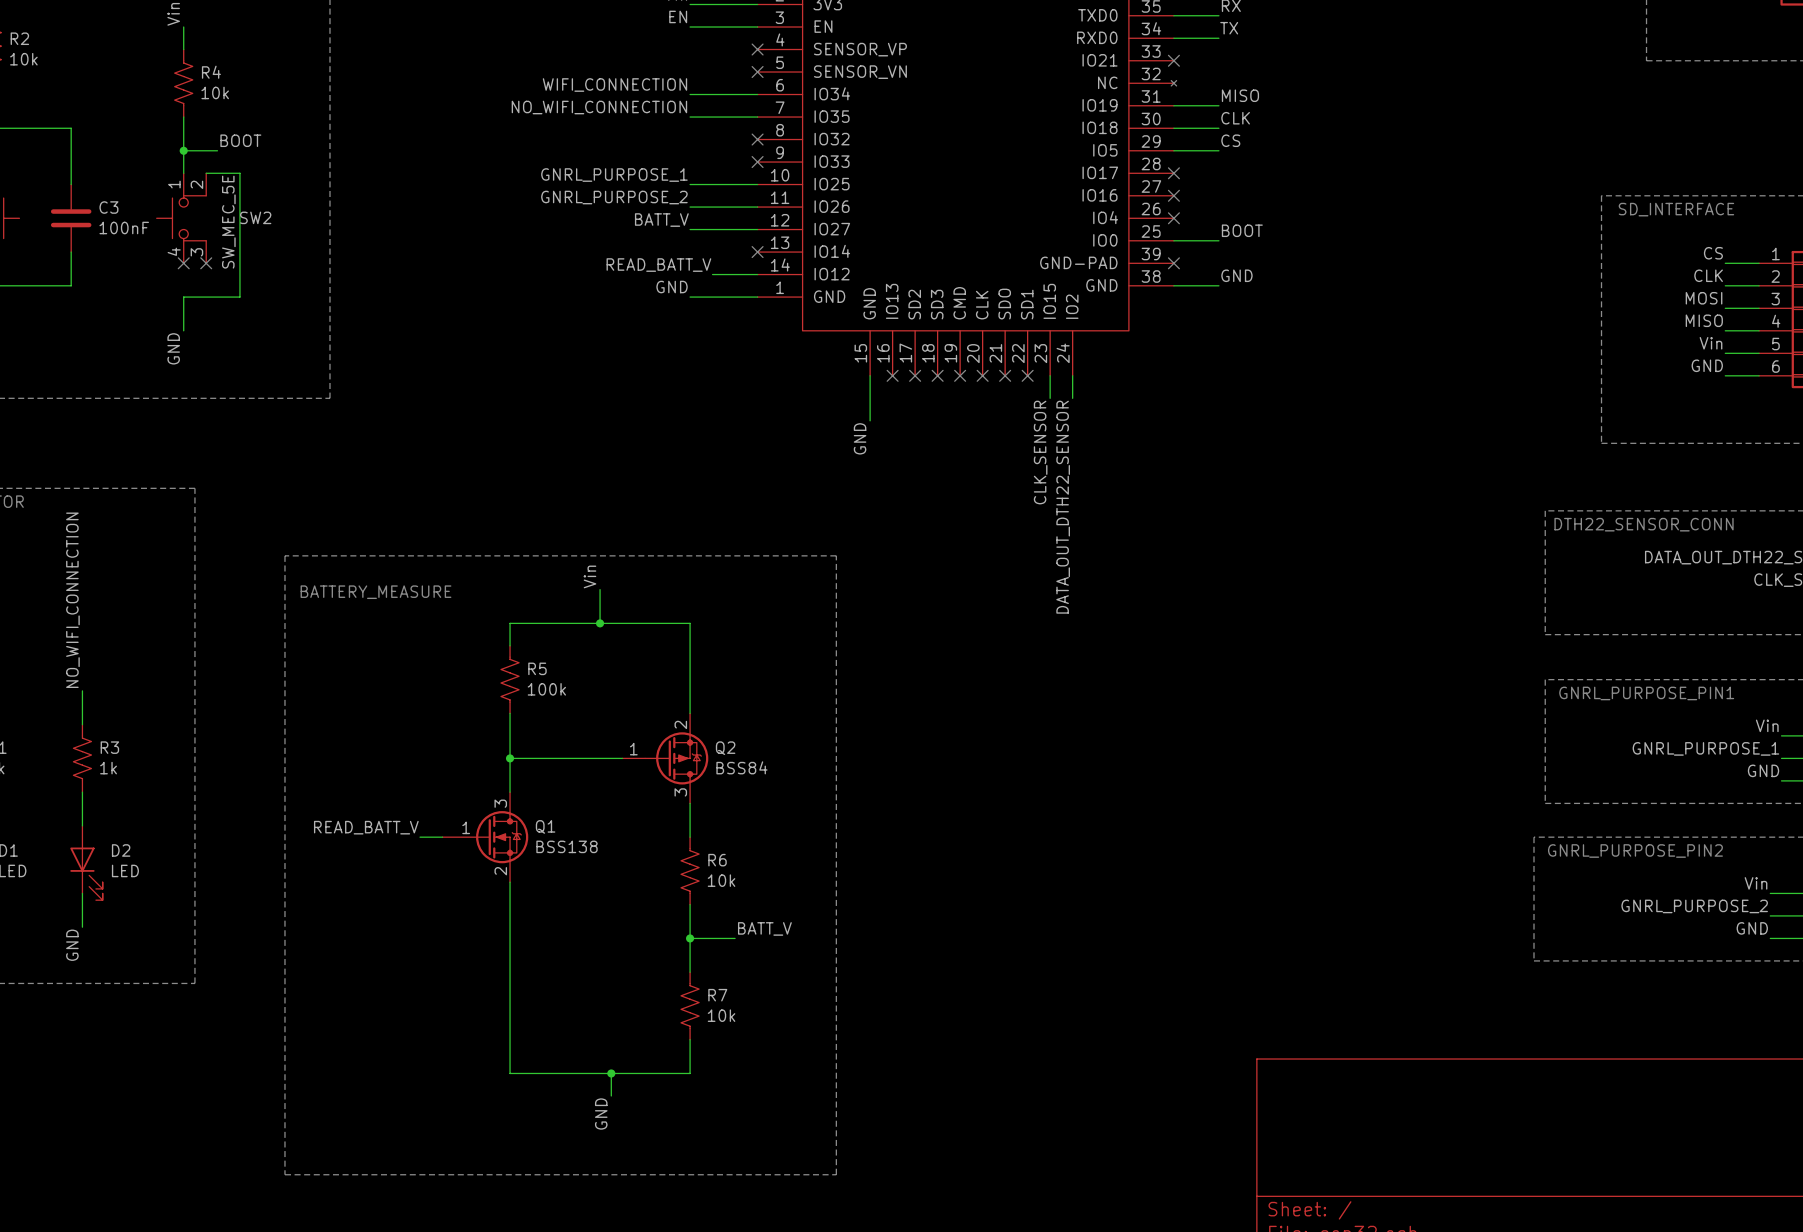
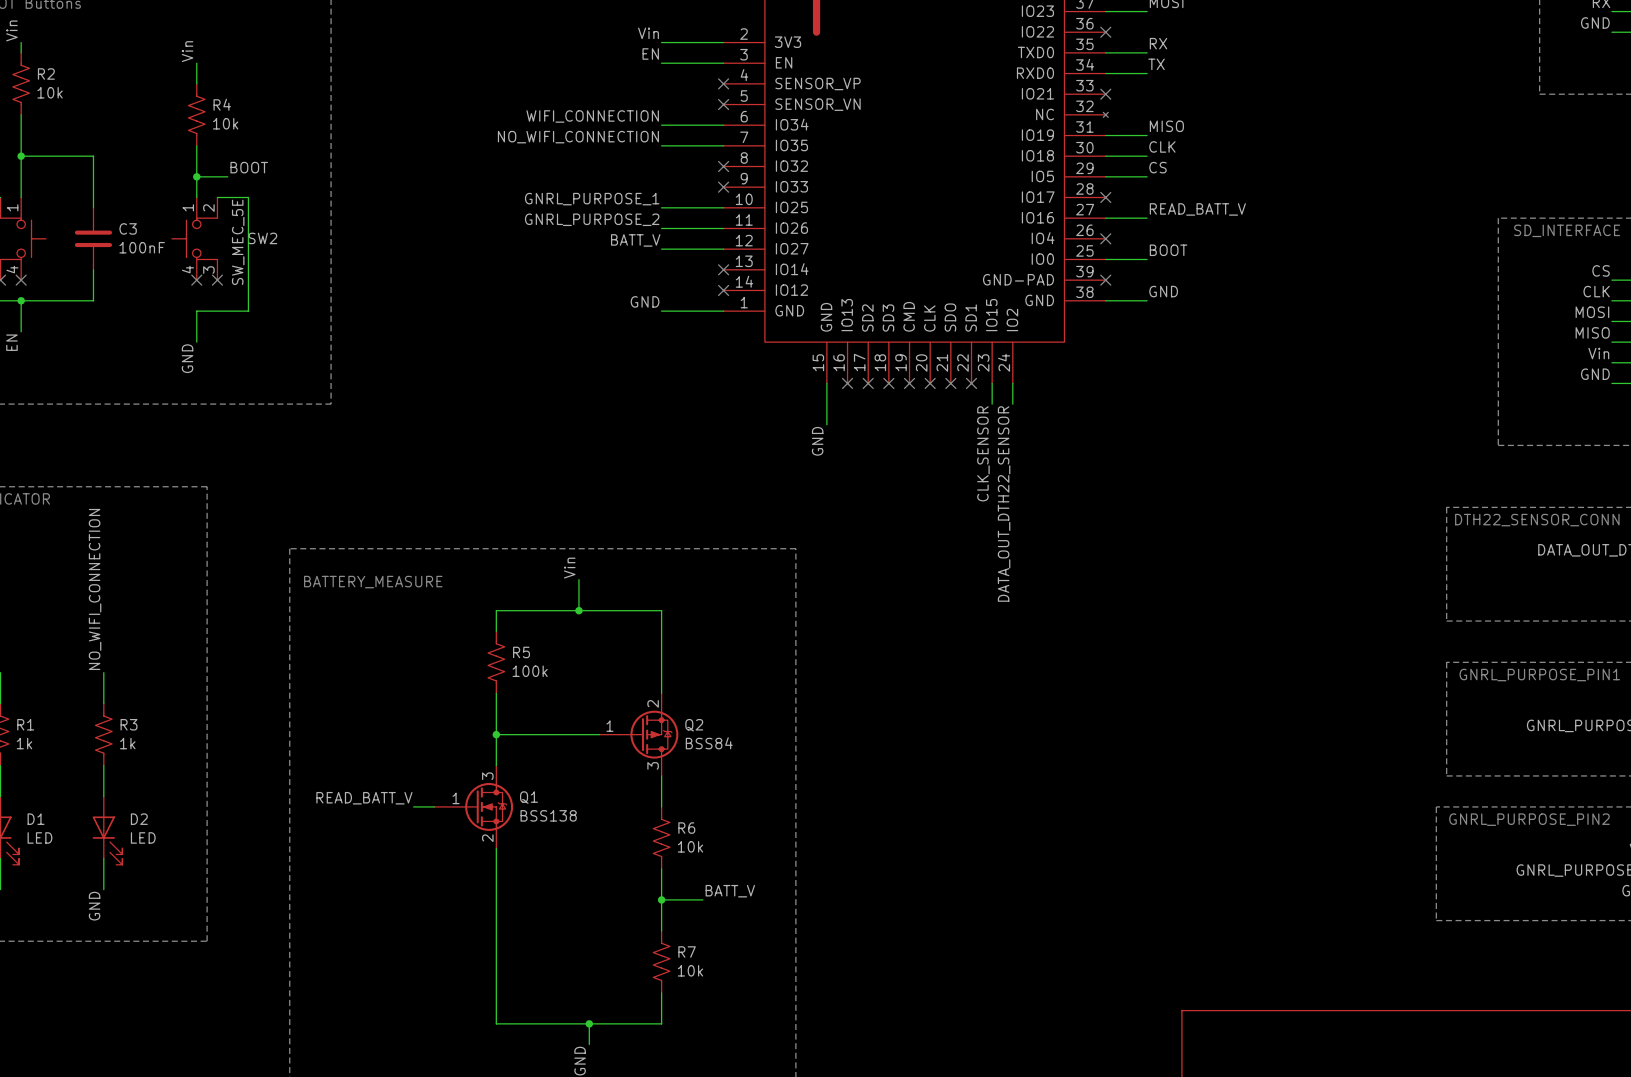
label: none -> READ_BATT_V (1197, 209)
wire: none -> (1105, 218) (1147, 218)
no-connect mark: (1173, 195) -> none
label: READ_BATT_V (658, 265) -> none
wire: (712, 274) (757, 274) -> none
no-connect mark: none -> (723, 290)

